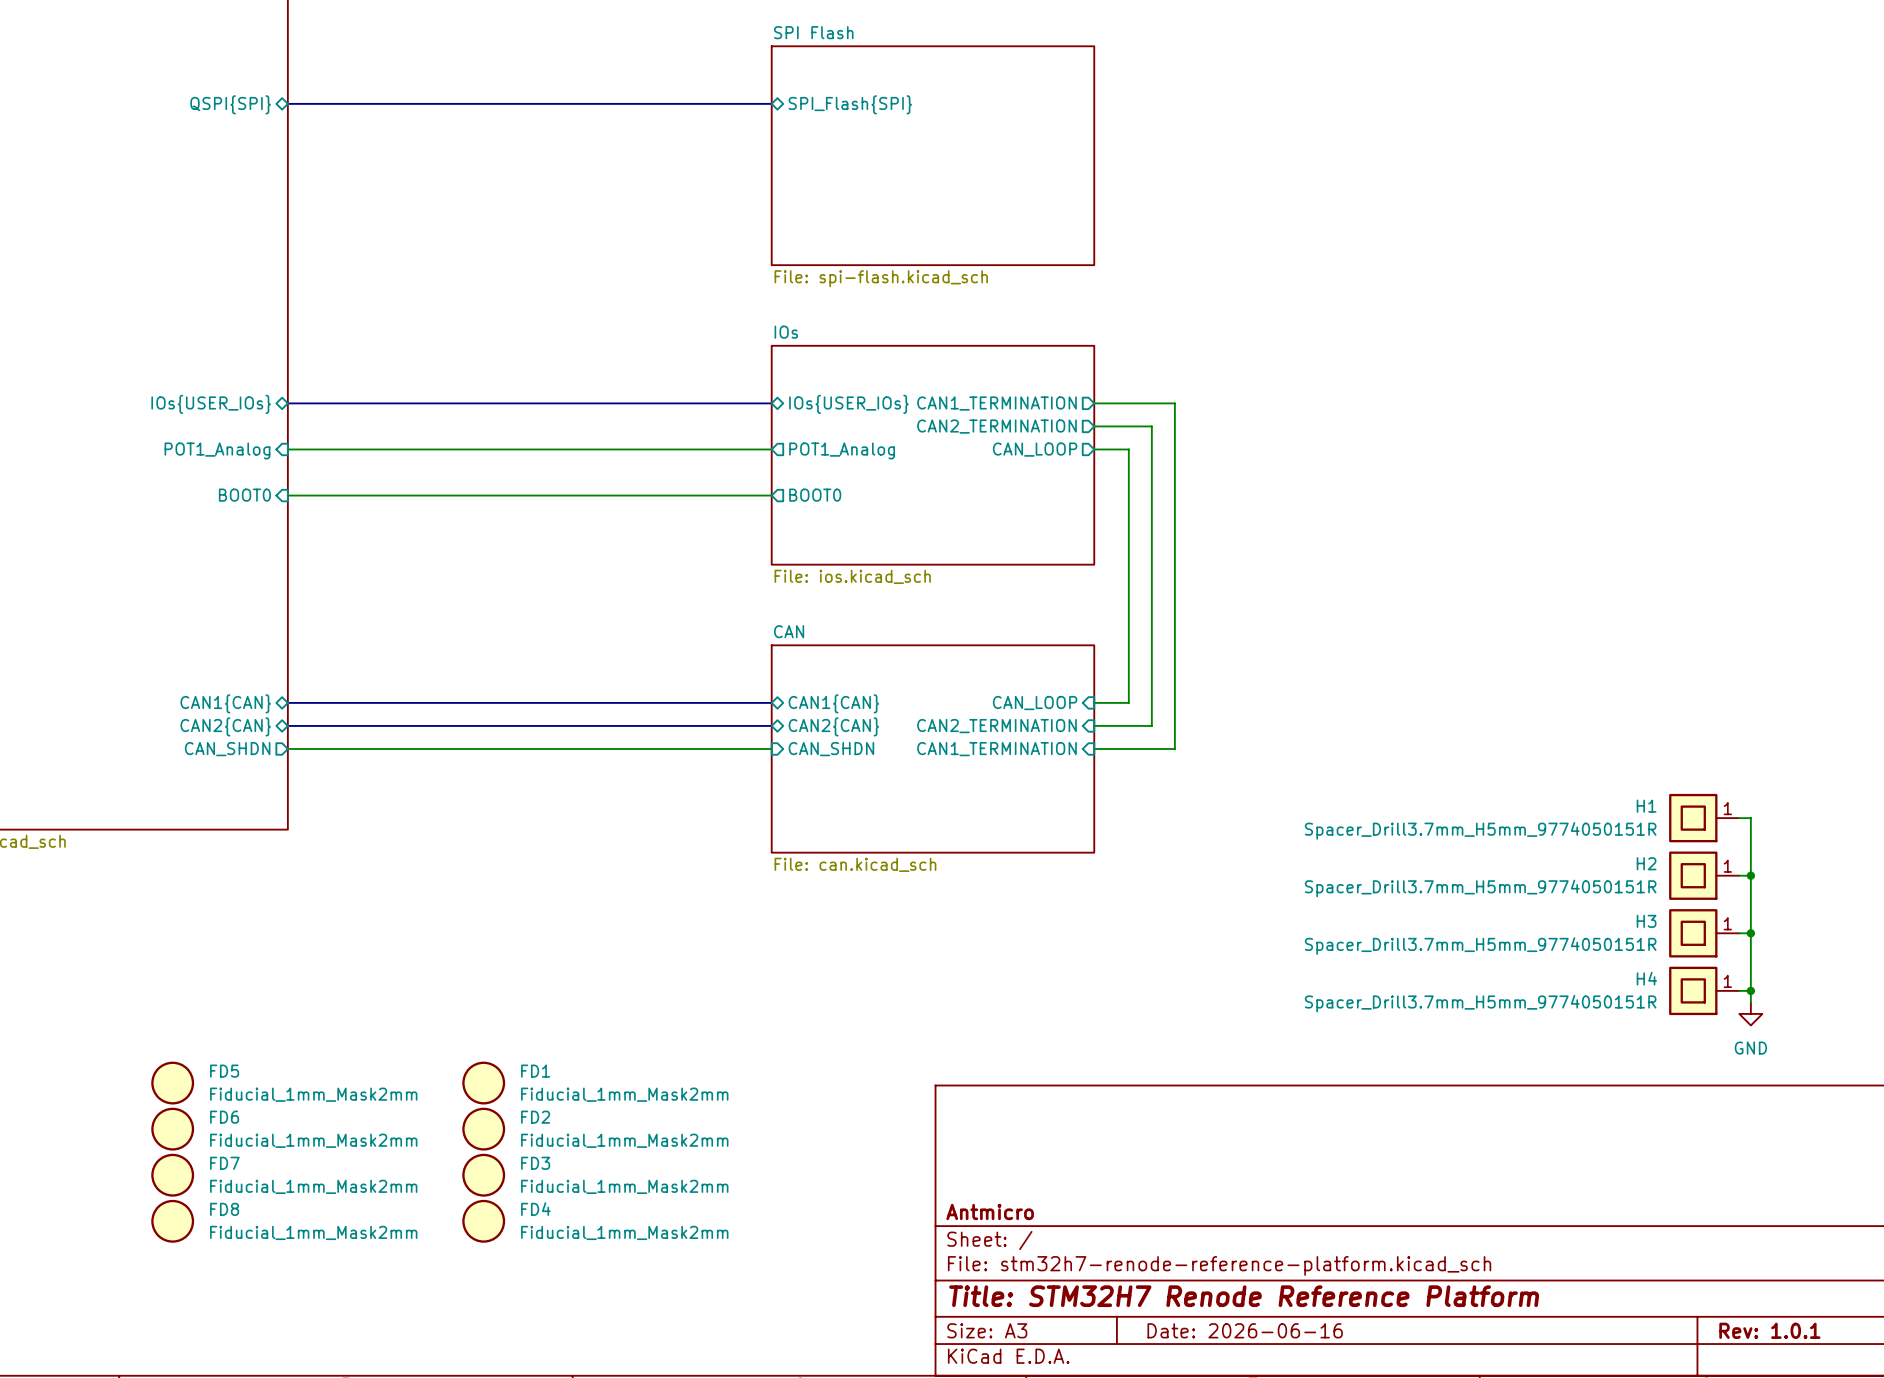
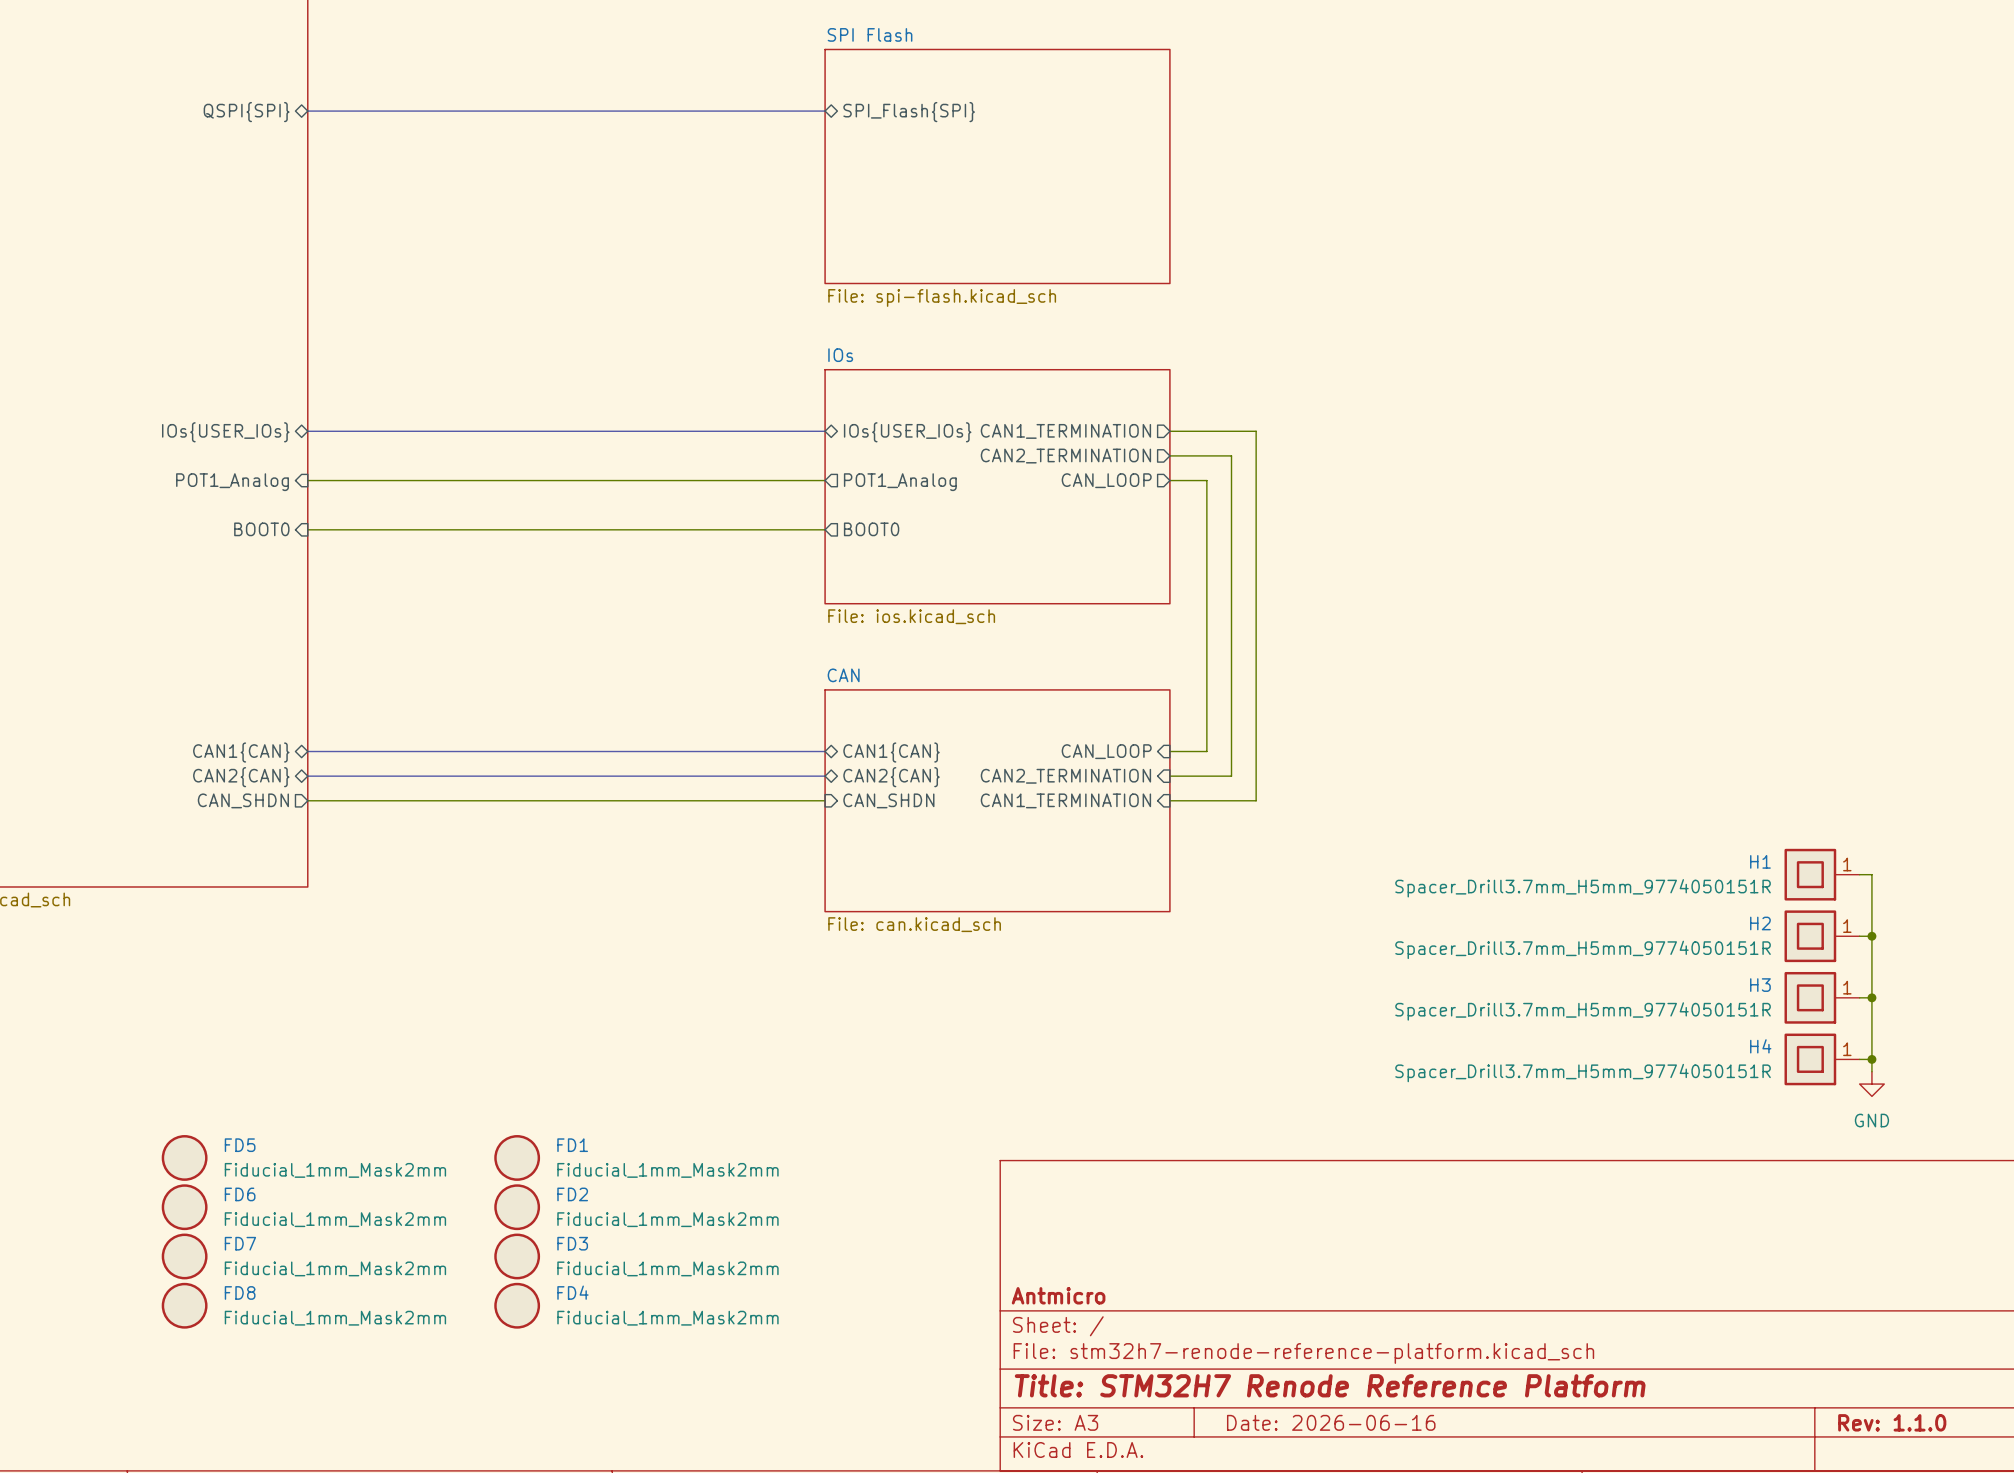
title block: Rev: 1.0.1 (1769, 1330) -> Rev: 1.1.0 (1892, 1422)

